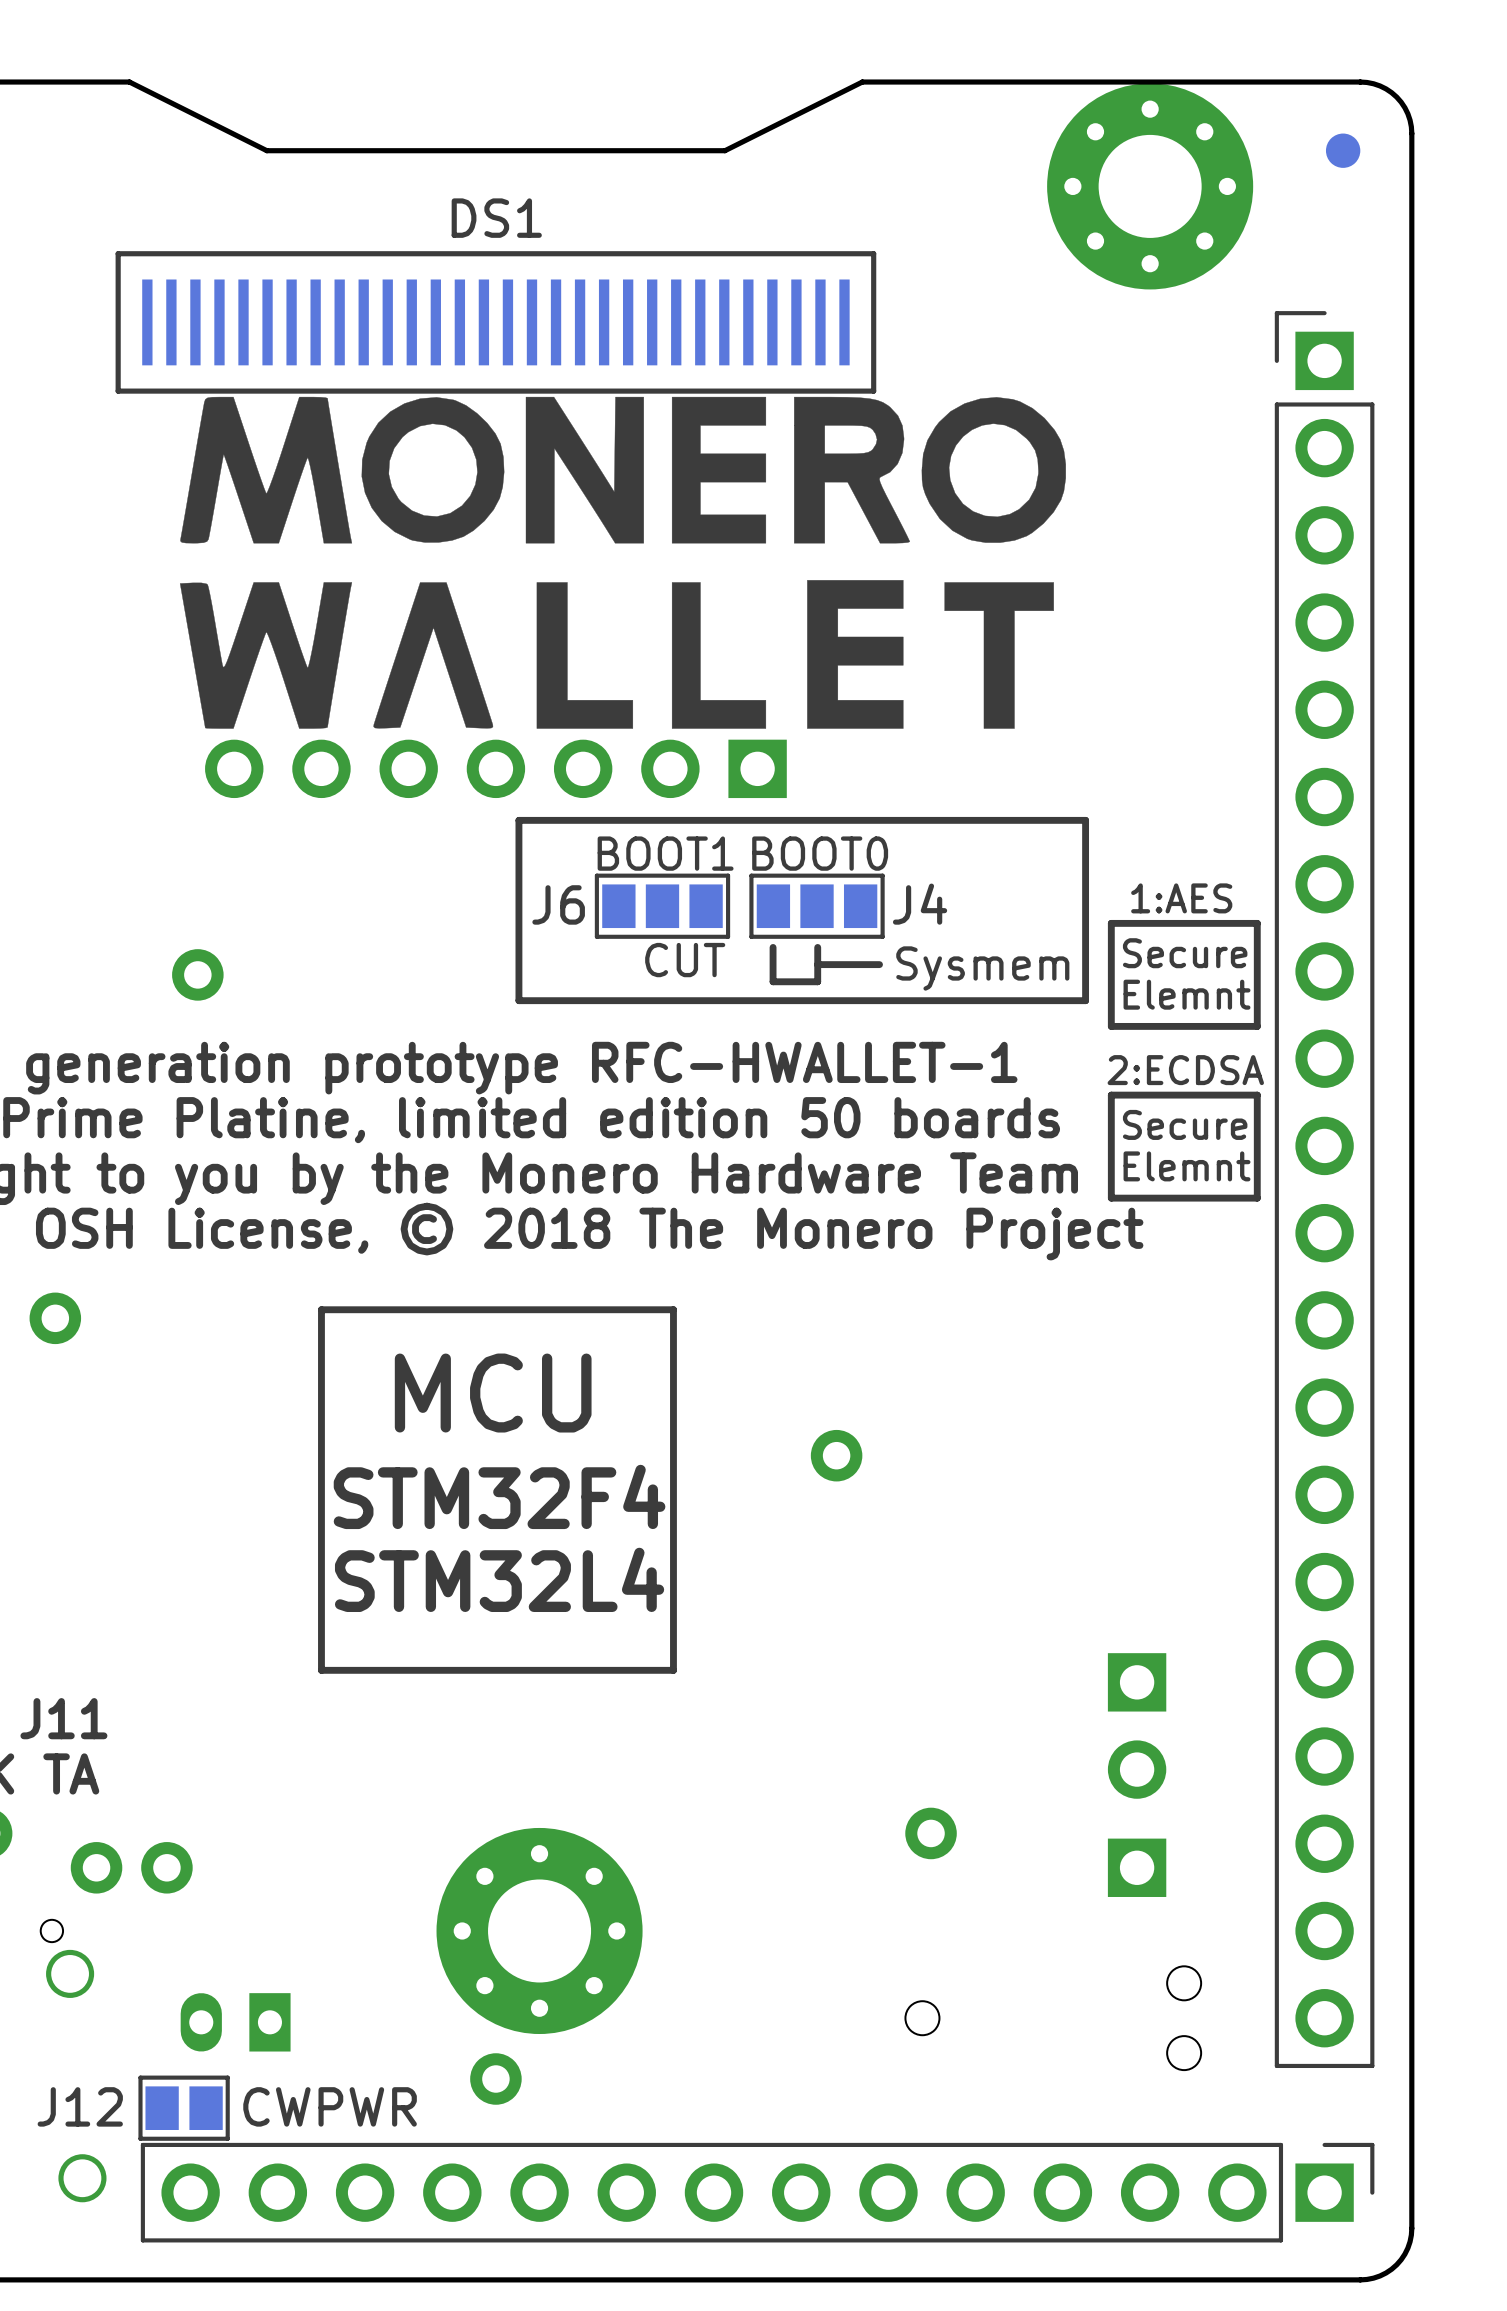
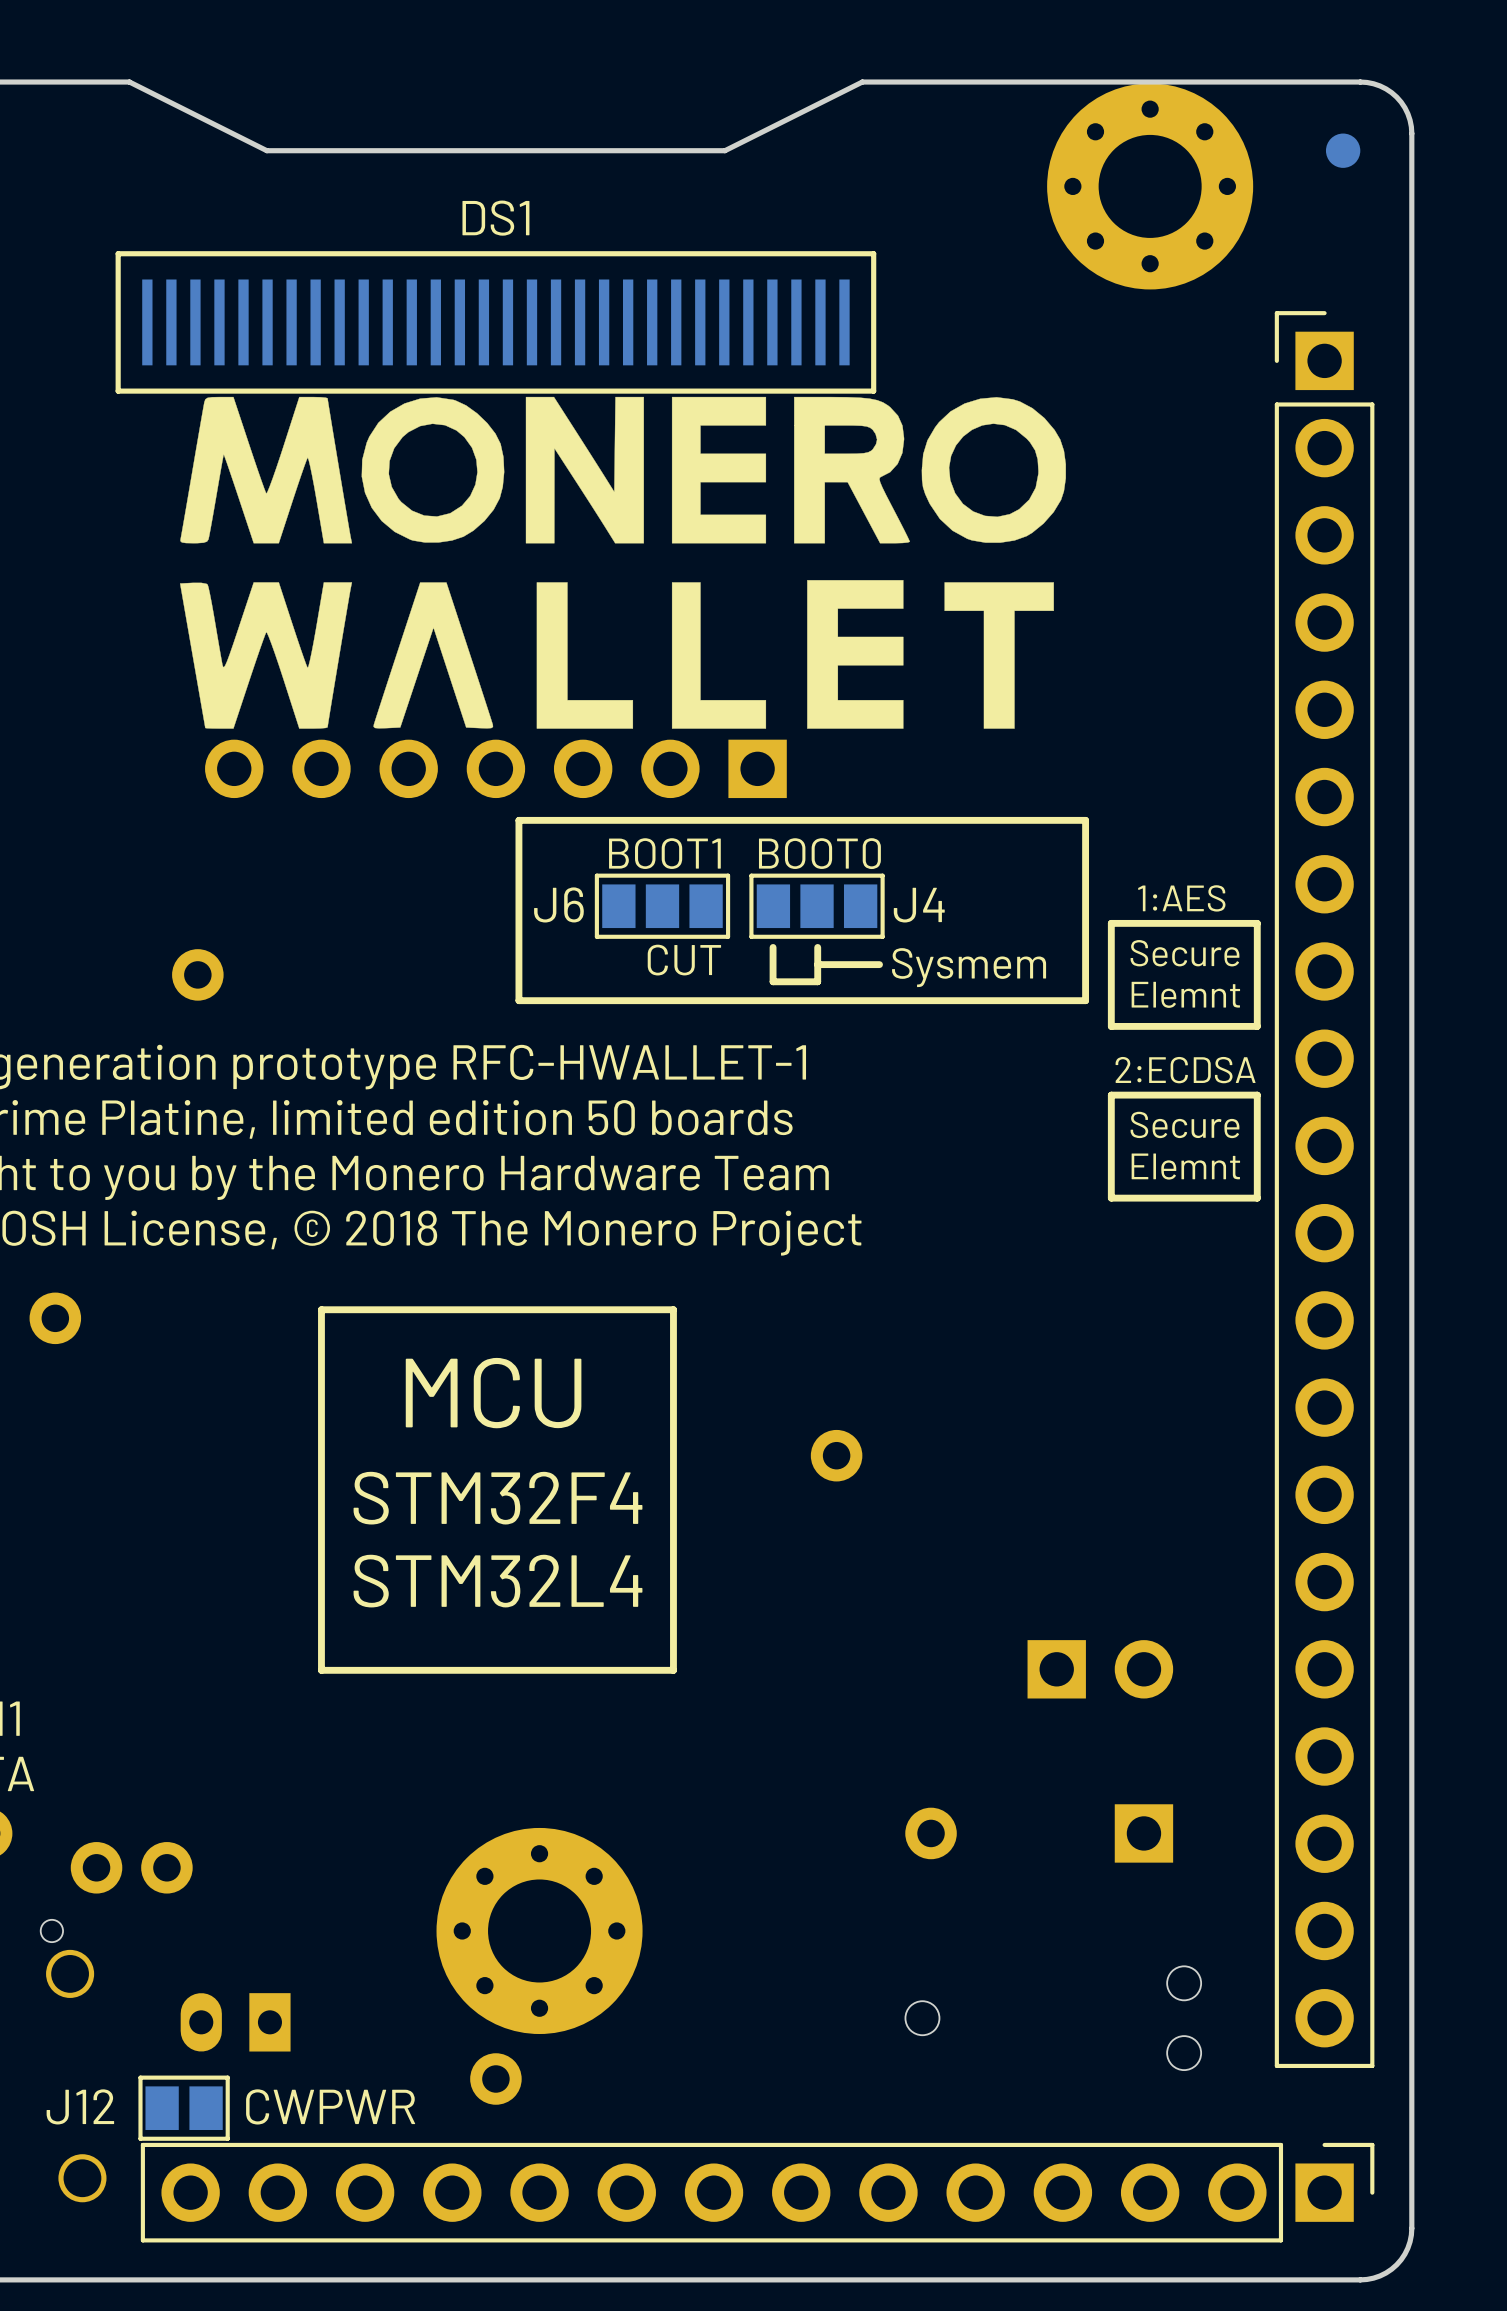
part rotation: 0° (1137, 1725) -> 90° counterclockwise (1100, 1669)
part position: (1137, 1867) -> (1143, 1833)

